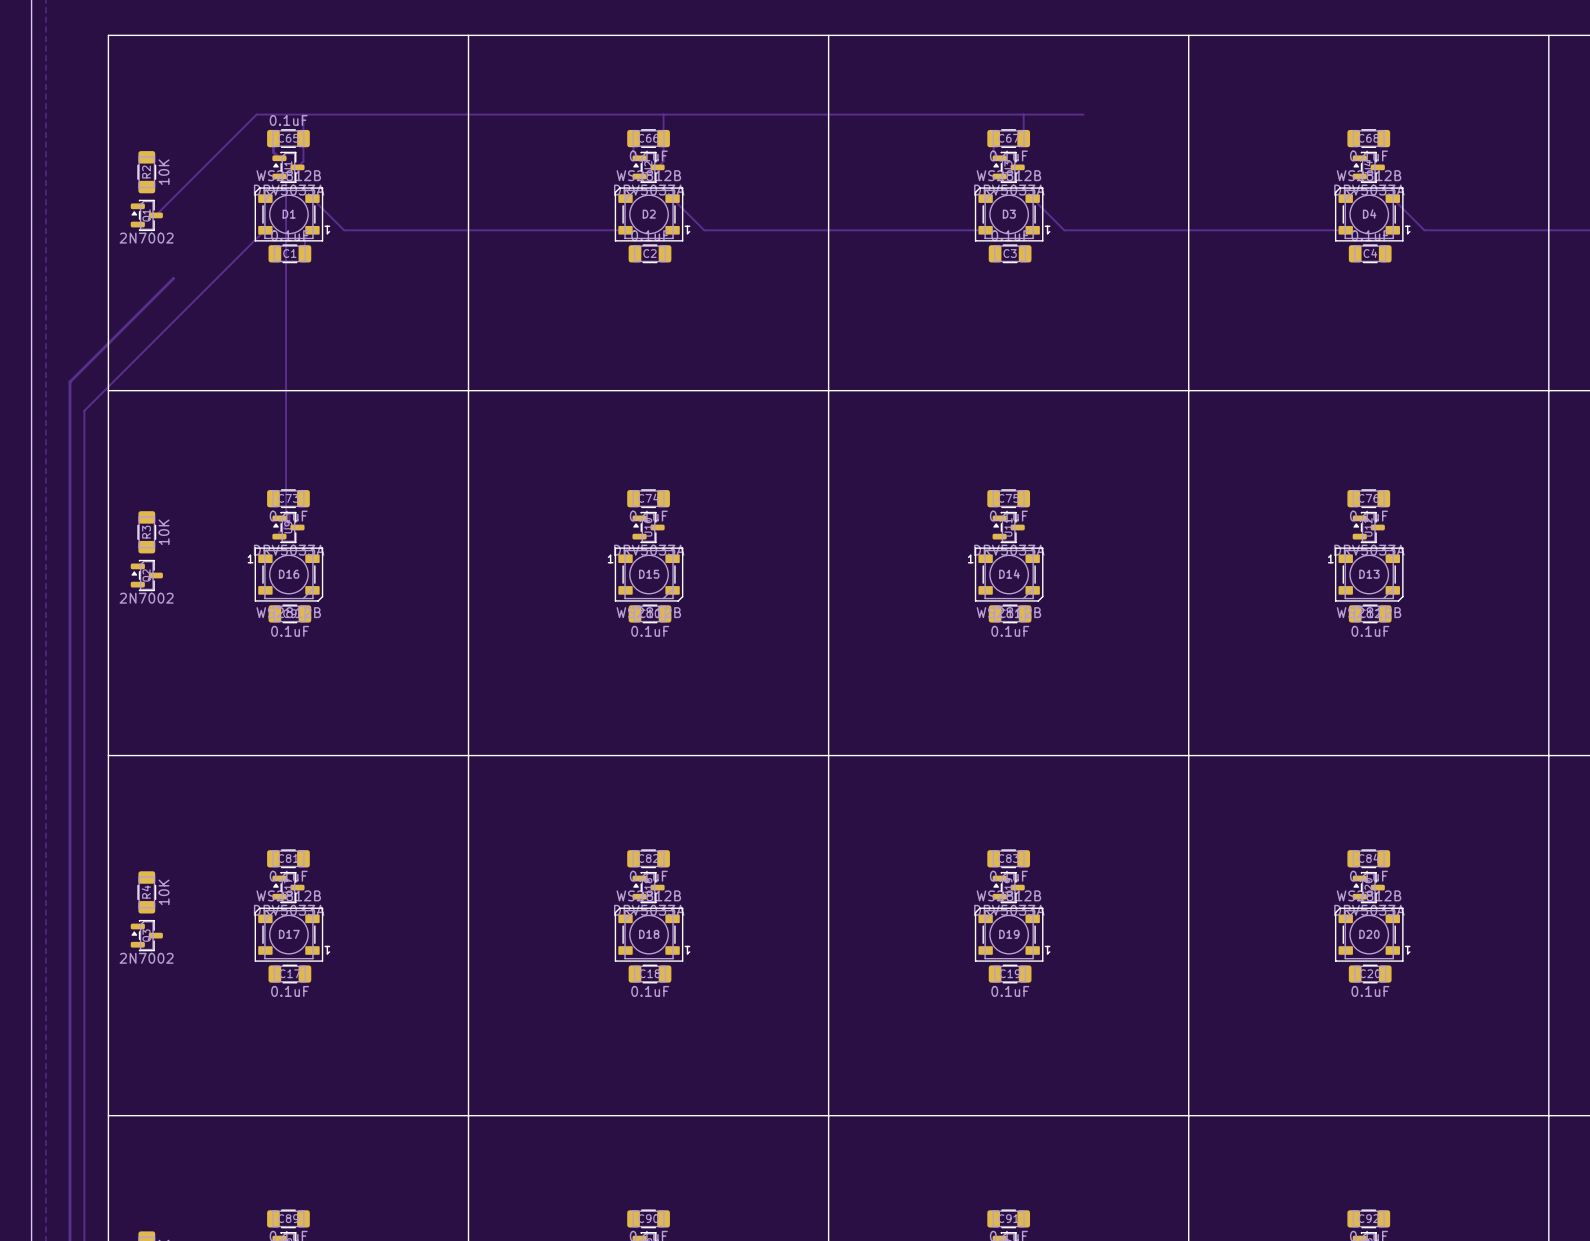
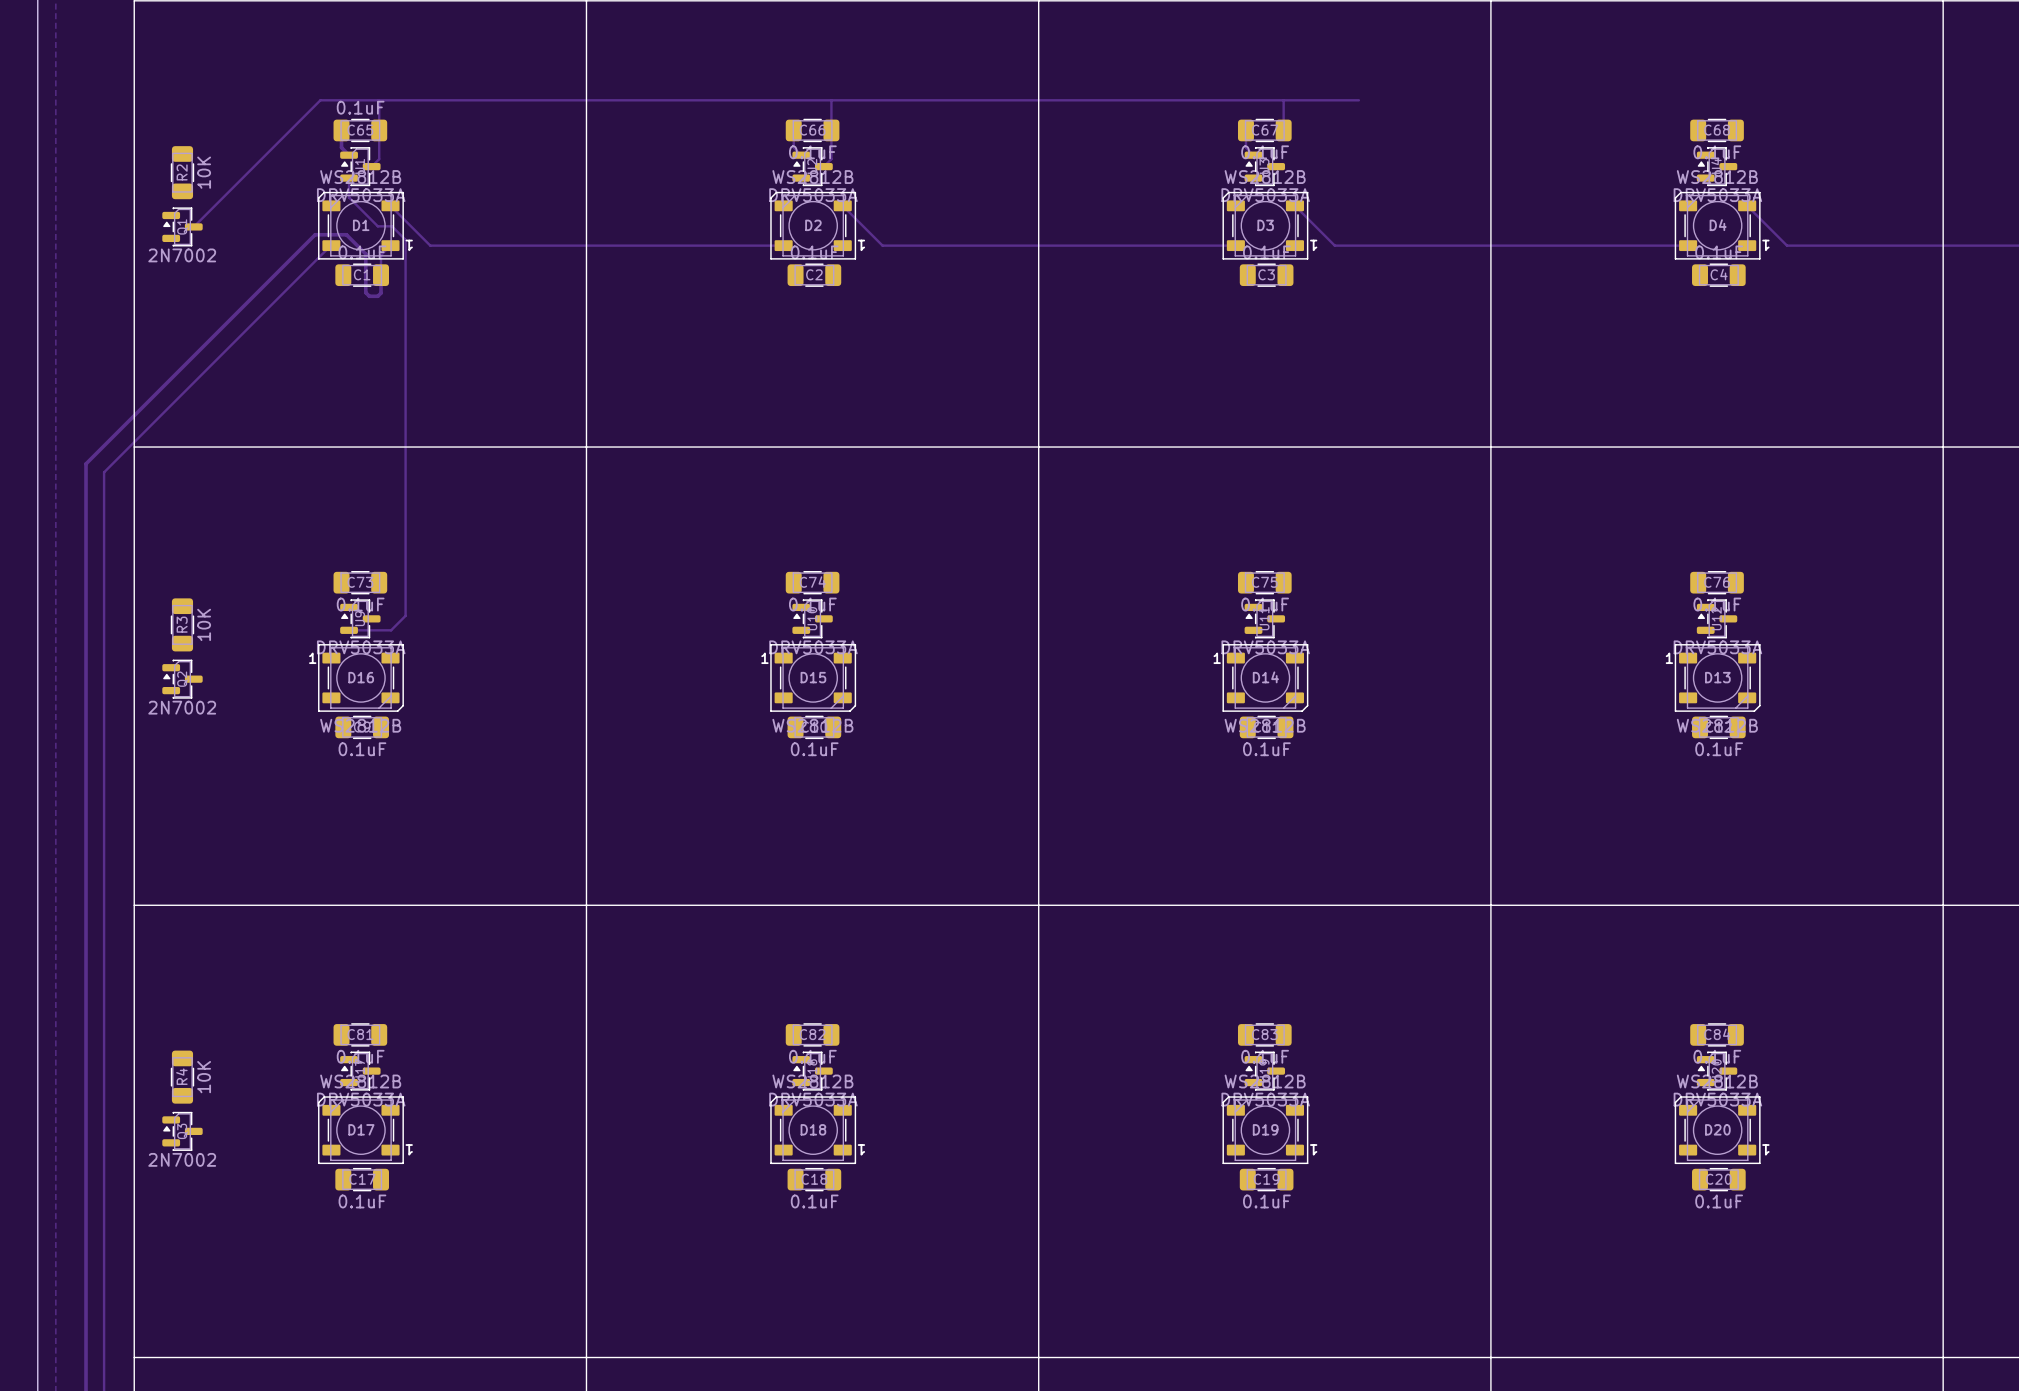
track: (279, 176) (286, 183) (286, 511) (289, 515) (289, 521) (279, 532) (279, 536) -> (349, 178) (349, 197) (377, 226) (392, 226) (405, 239) (405, 615) (391, 630) (349, 630)
track: (173, 278) (69, 382) (69, 404) -> (381, 275) (381, 293) (377, 296) (369, 296) (365, 292) (365, 254) (346, 234) (315, 234) (86, 463)

